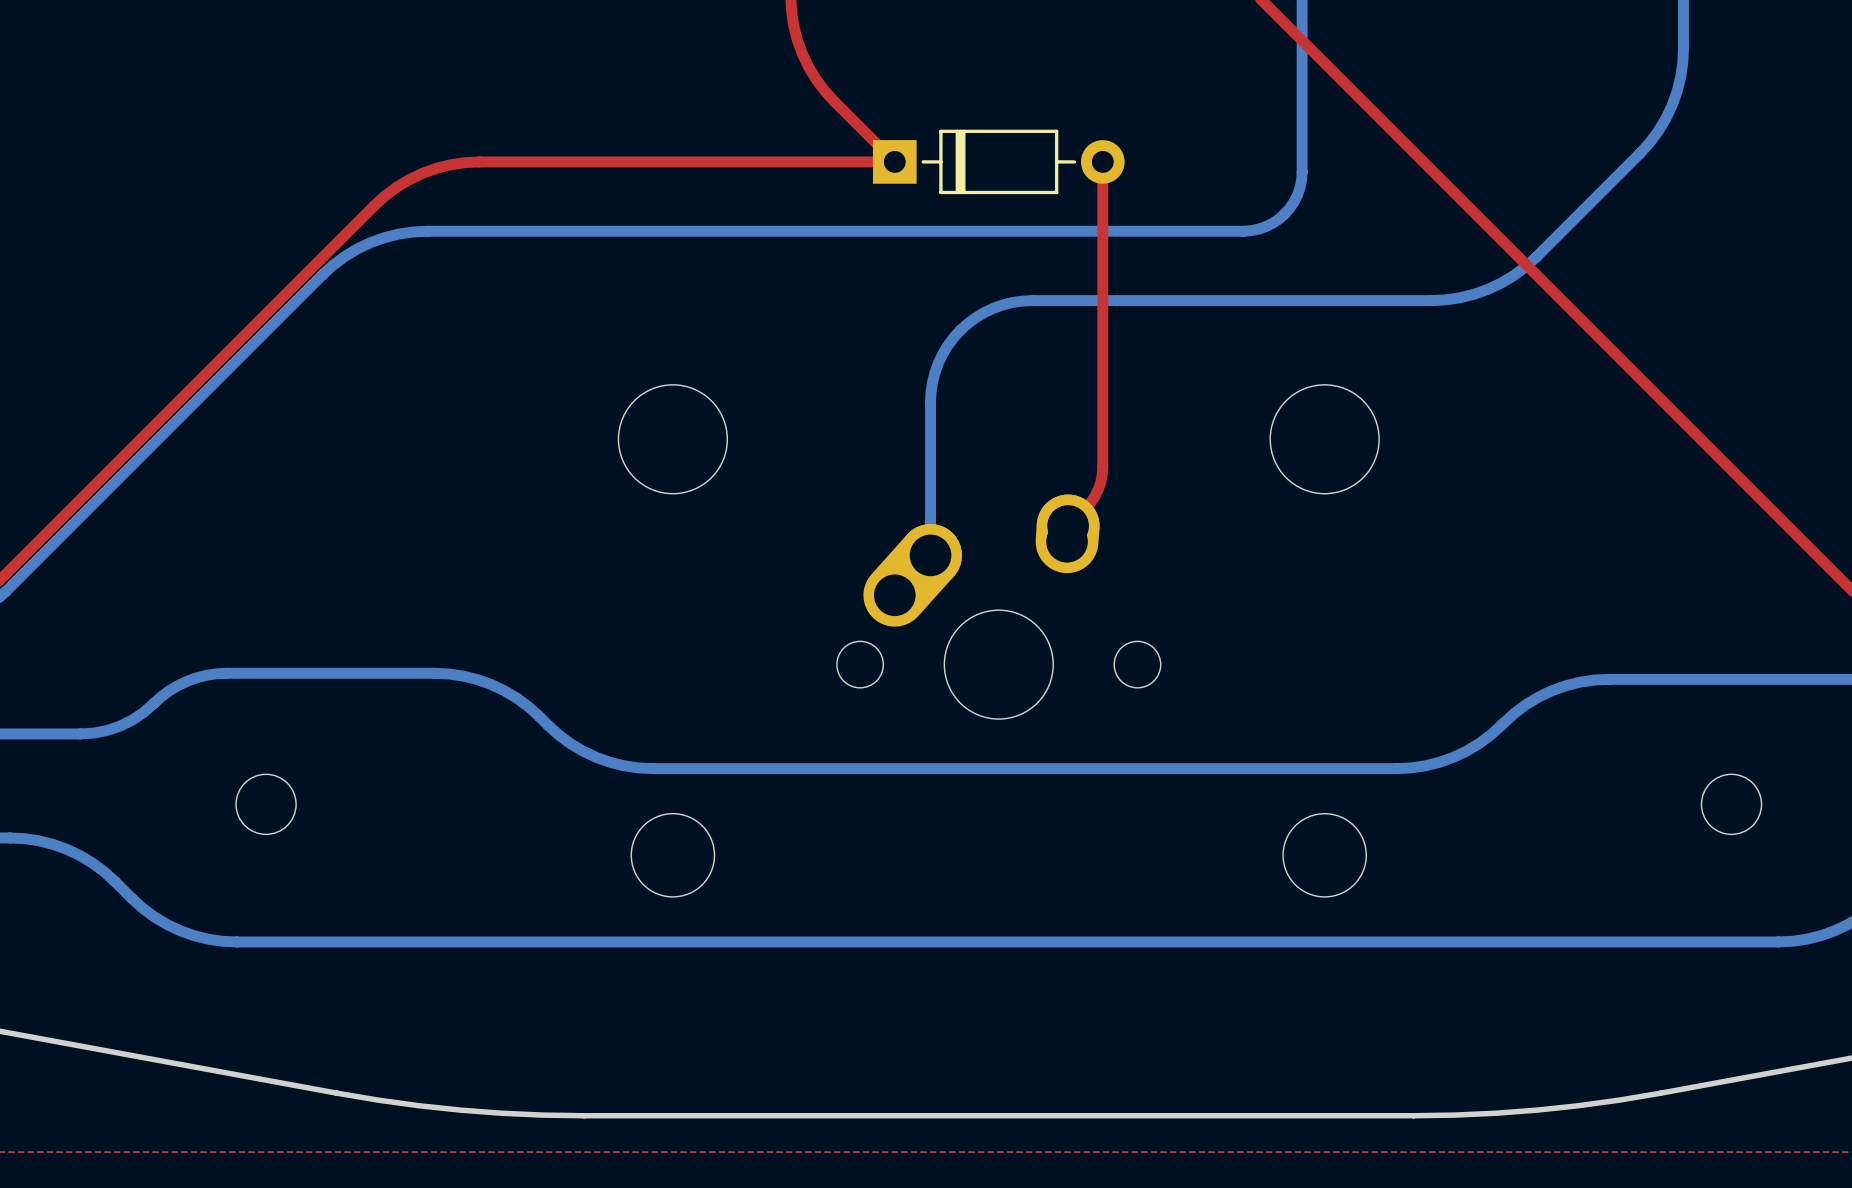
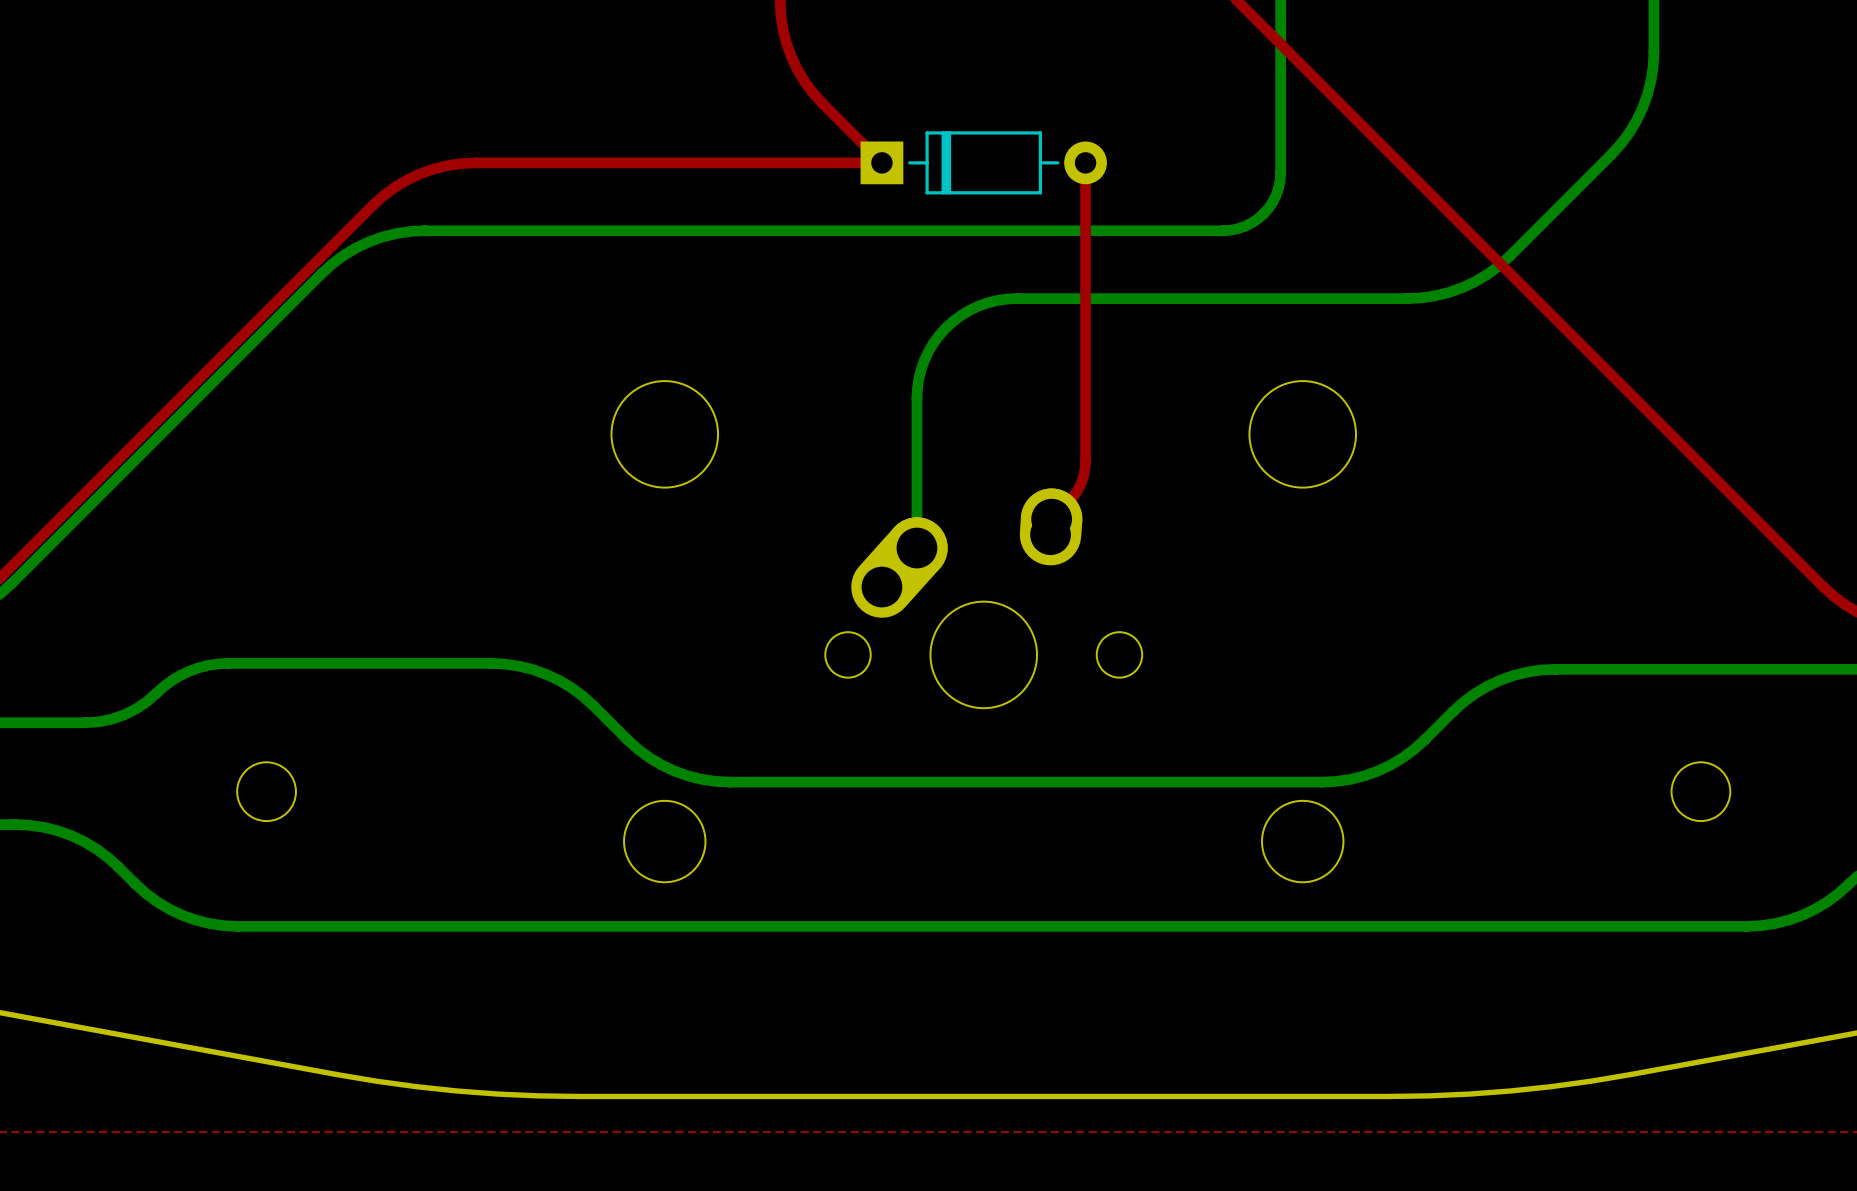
bottom track: (434, 673) (463, 676) (491, 684) (517, 698) (558, 734) (582, 751) (609, 762) (652, 768) (1411, 767) (1439, 762) (1466, 751) (1490, 734) (1526, 704) (1552, 690) (1579, 682) (1608, 679) -> (431, 663) (505, 664) (546, 674) (583, 696) (637, 749) (661, 764) (701, 779) (730, 782) (1336, 781) (1377, 771) (1403, 757) (1425, 739) (1463, 702) (1499, 680) (1541, 670) (1580, 669)

